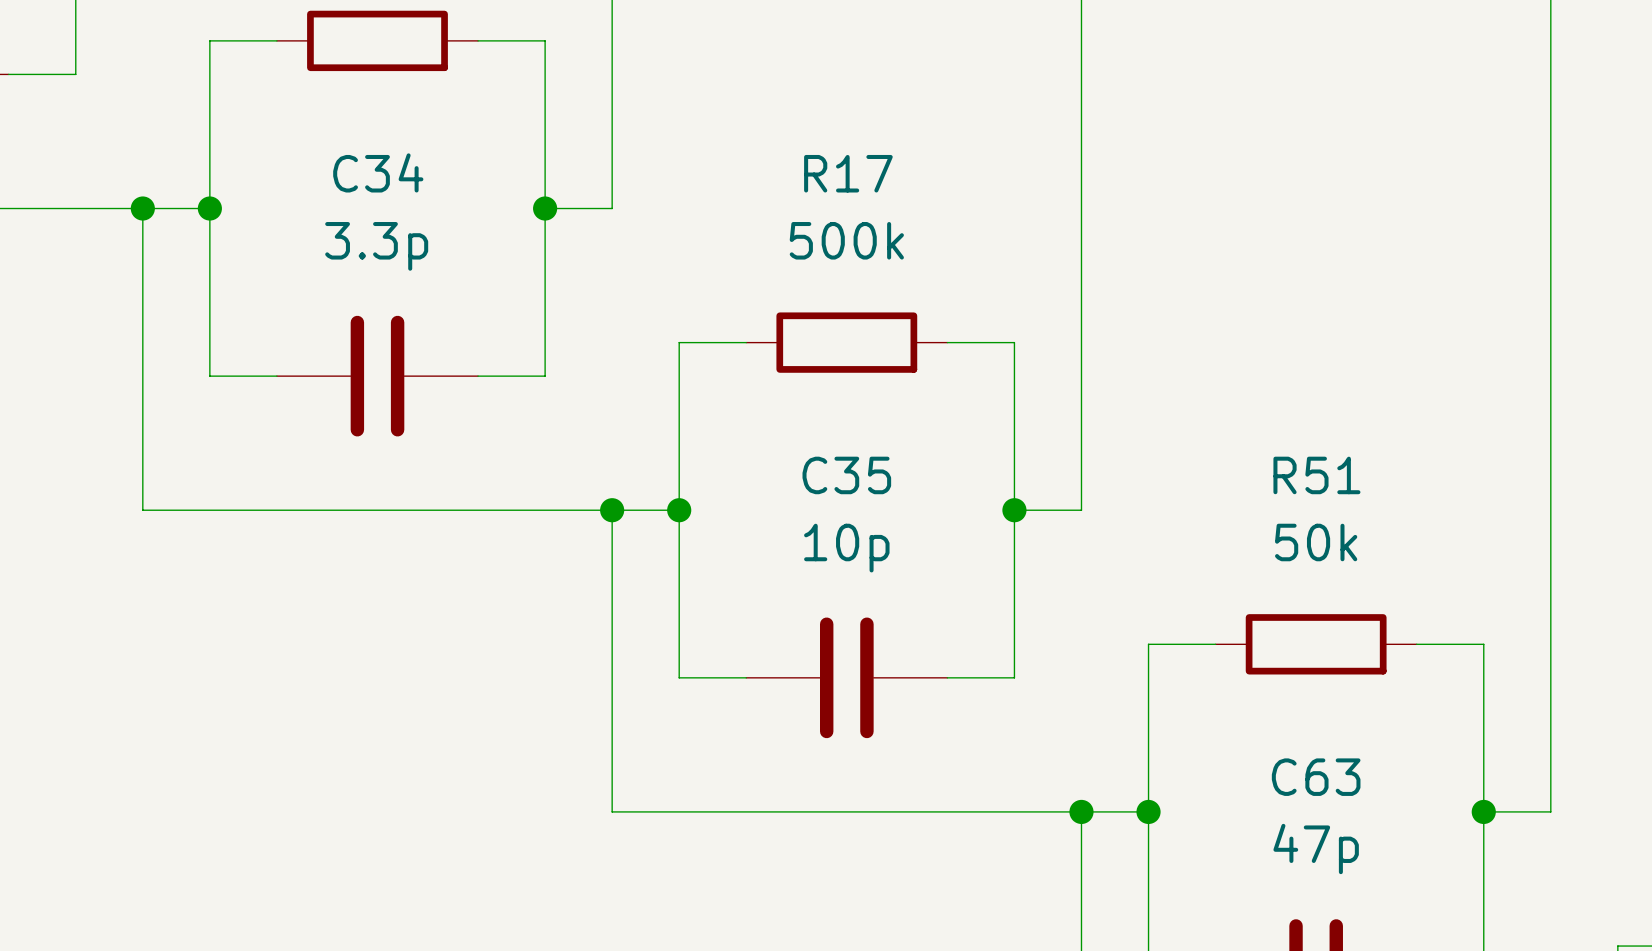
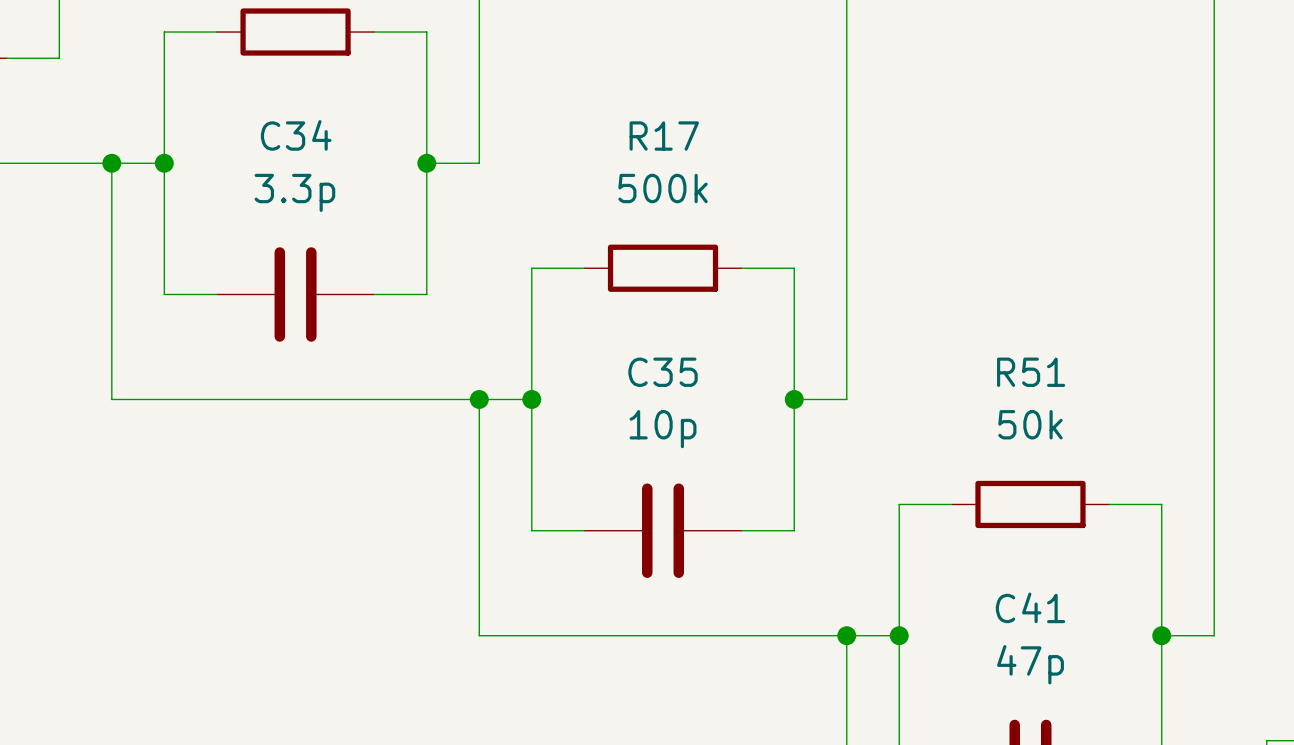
C63 name: C63 (1316, 777) -> C41 (1030, 607)

